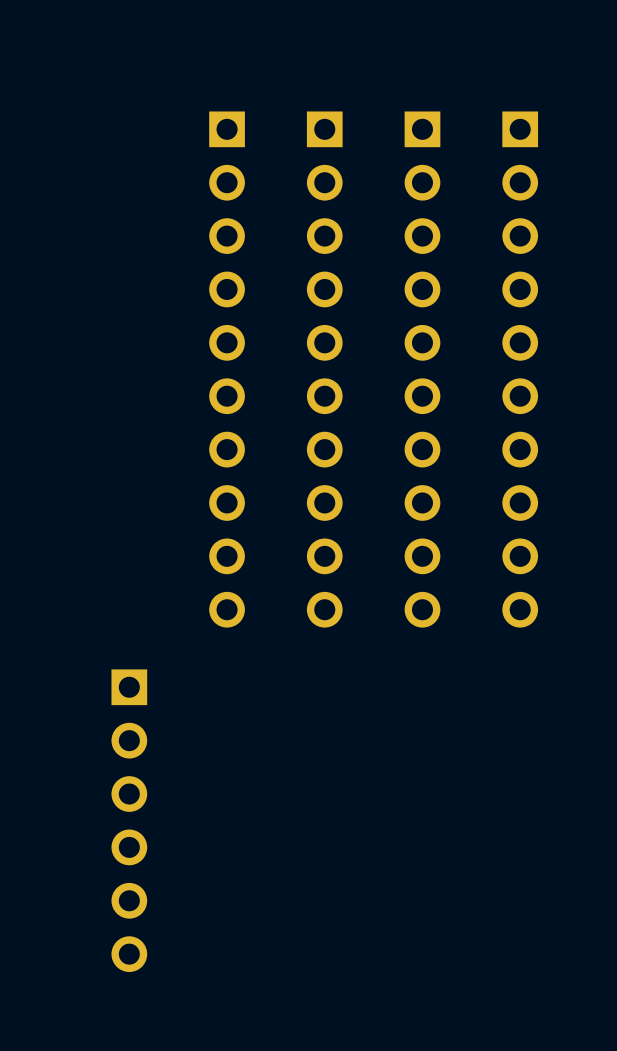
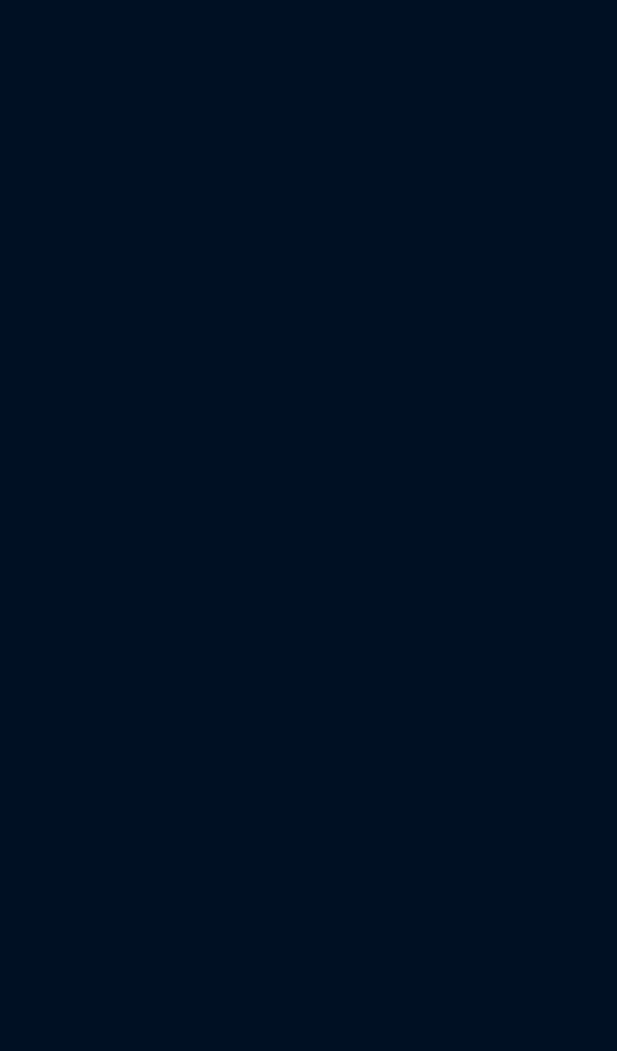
part: (227, 369) -> none
part: (324, 369) -> none
part: (422, 369) -> none
part: (520, 369) -> none
part: (129, 820) -> none

